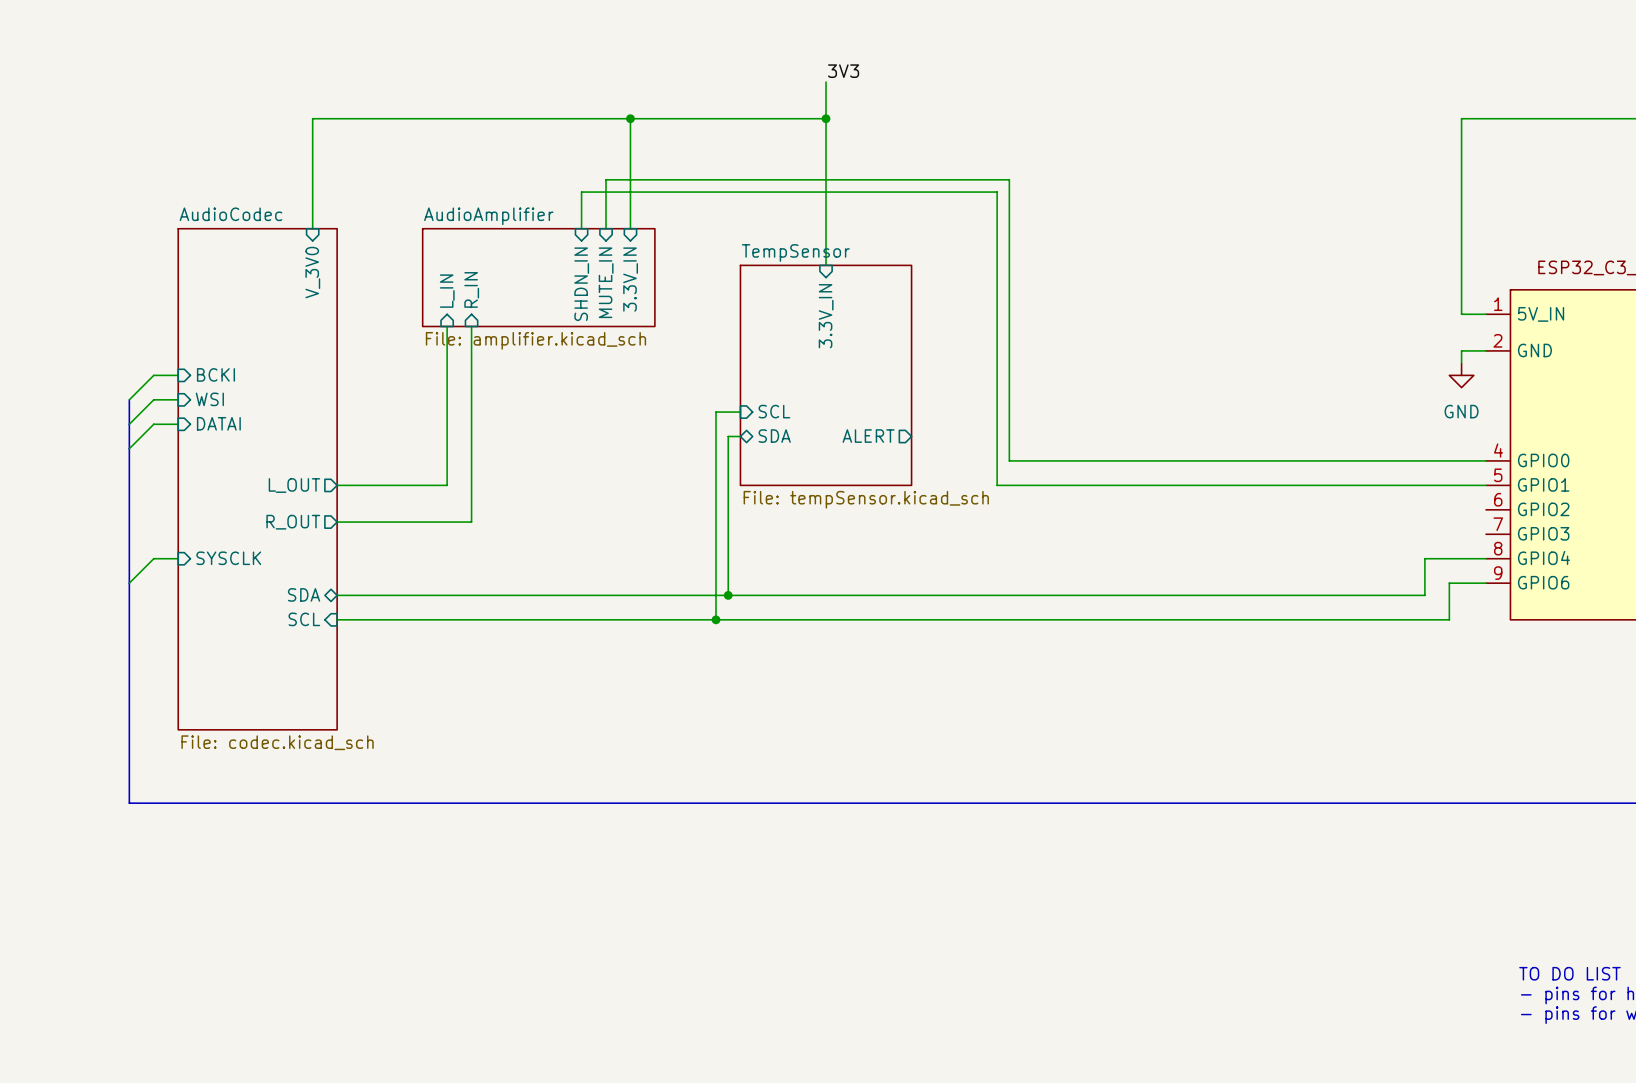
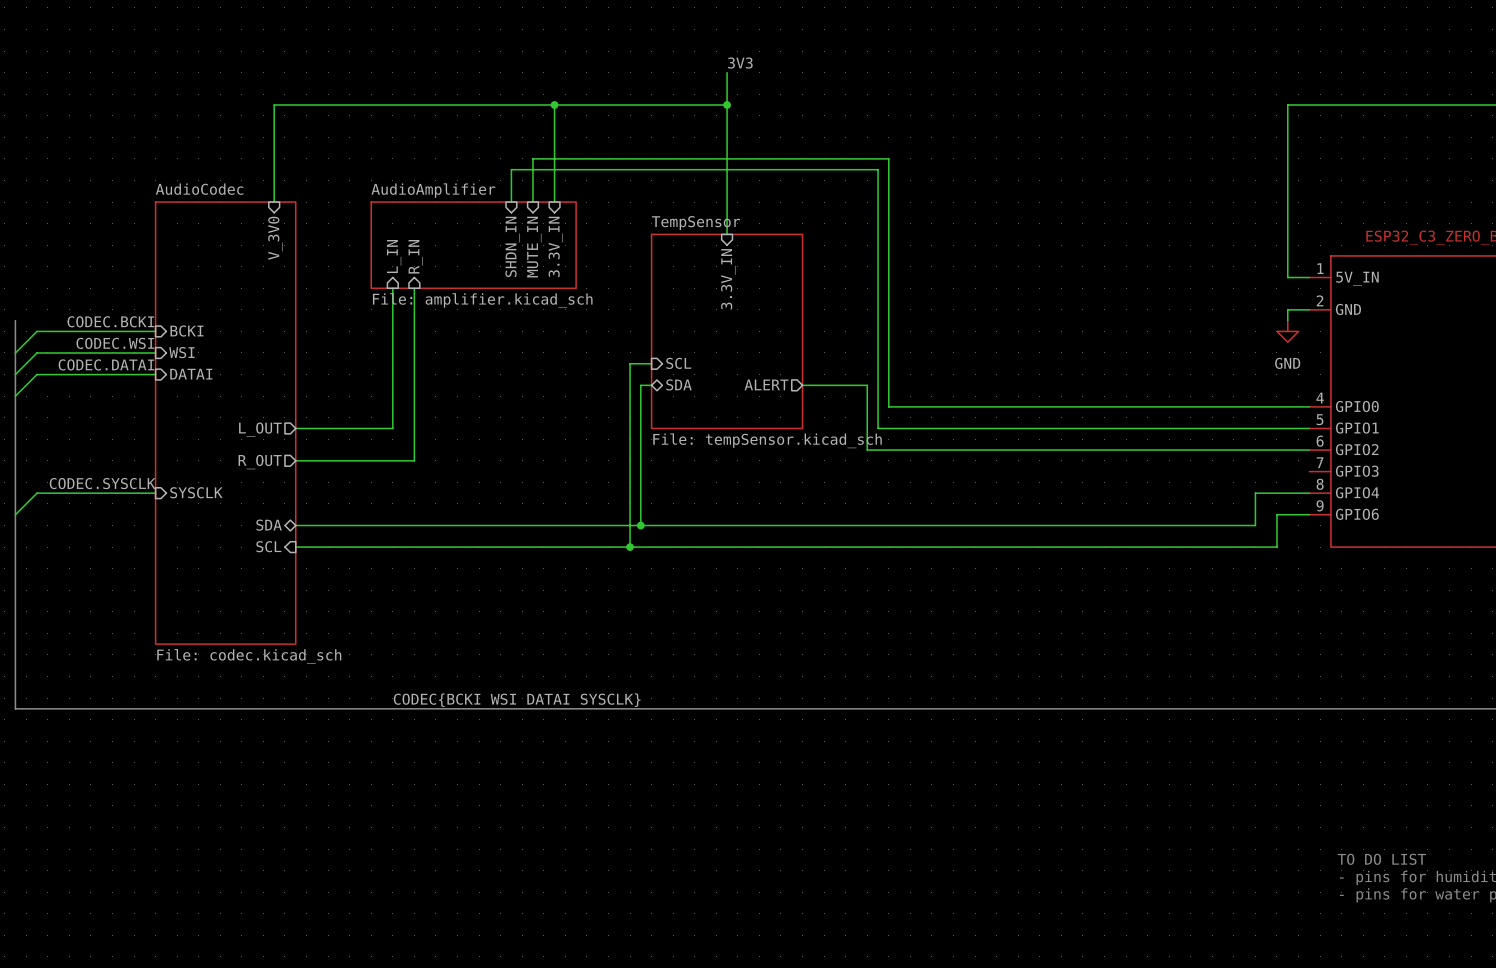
label: none -> CODEC.BCKI (110, 321)
wire: (153, 375) (129, 399) -> (134, 331) (36, 331) (15, 352)
label: none -> CODEC.WSI (115, 343)
bus: (129, 399) (129, 803) -> (15, 320) (15, 708) (112, 708)
wire: (153, 399) (129, 424) -> (134, 352) (36, 352) (15, 374)
label: none -> CODEC.DATAI (106, 364)
wire: (153, 424) (129, 448) -> (134, 374) (36, 374) (15, 396)
wire: none -> (802, 385) (867, 385) (867, 450) (1309, 450)
label: none -> CODEC.SYSCLK (102, 483)
wire: (153, 558) (129, 583) -> (134, 493) (36, 493) (15, 514)
label: none -> CODEC{BCKI WSI DATAI SYSCLK} (517, 700)

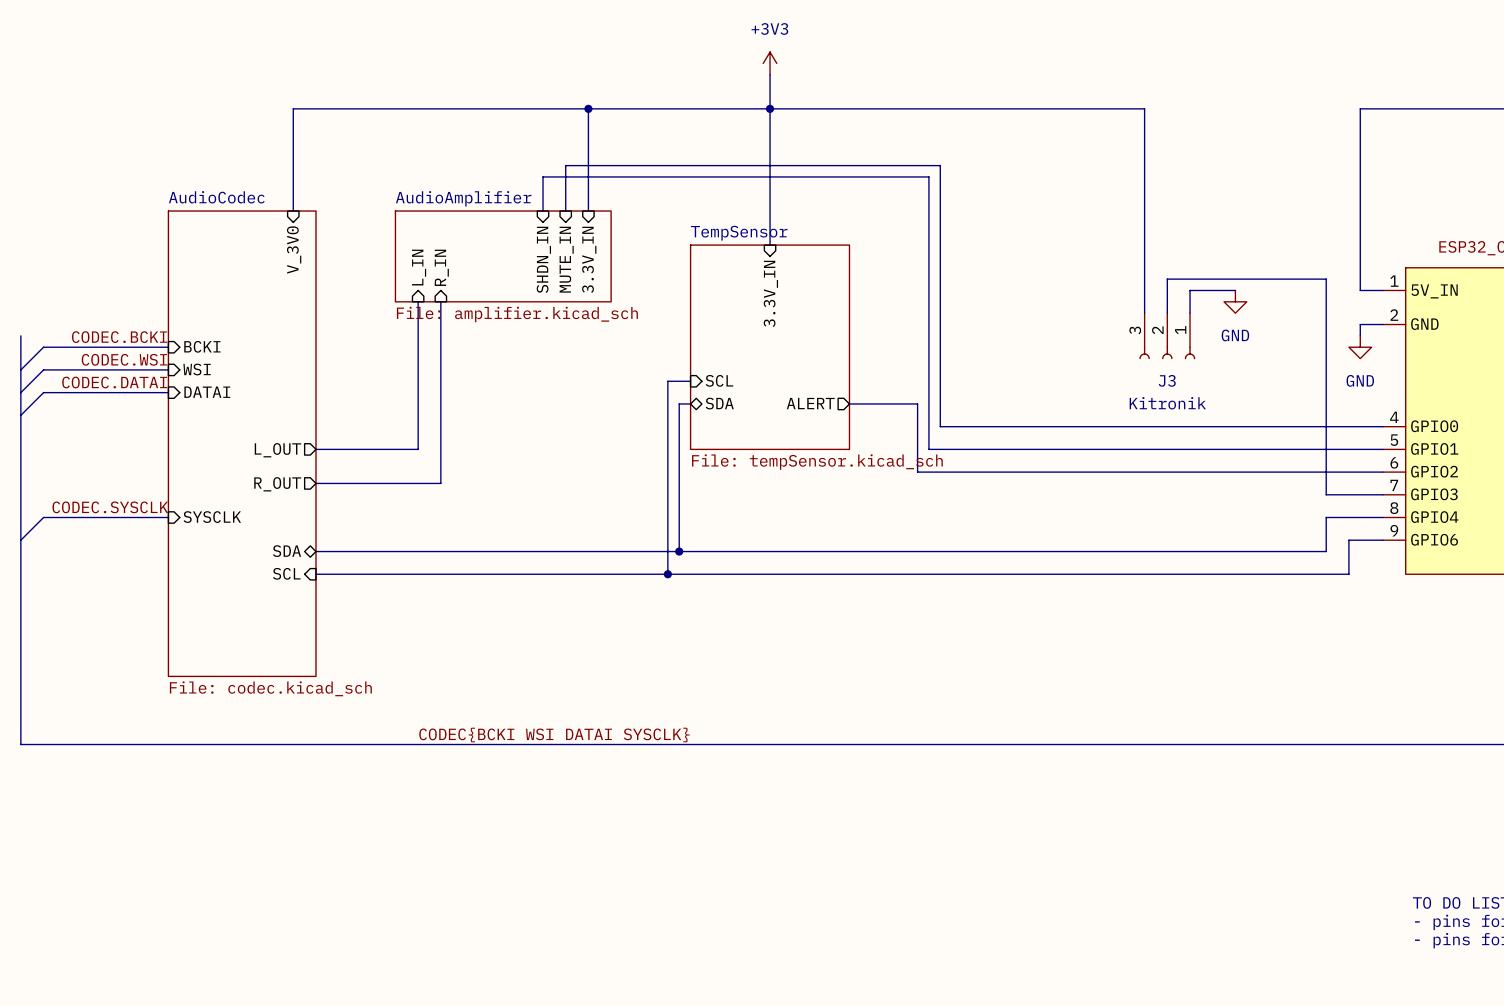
power symbol: none -> +3V3 (770, 63)
label: 3V3 (740, 63) -> none
wire: none -> (770, 108) (1144, 108) (1144, 313)
wire: none -> (1235, 290) (1190, 290) (1190, 313)
power symbol: none -> GND (1235, 301)
wire: none -> (1167, 313) (1167, 279) (1326, 279) (1326, 494) (1382, 494)
J3: none -> Kitronik (1167, 336)

